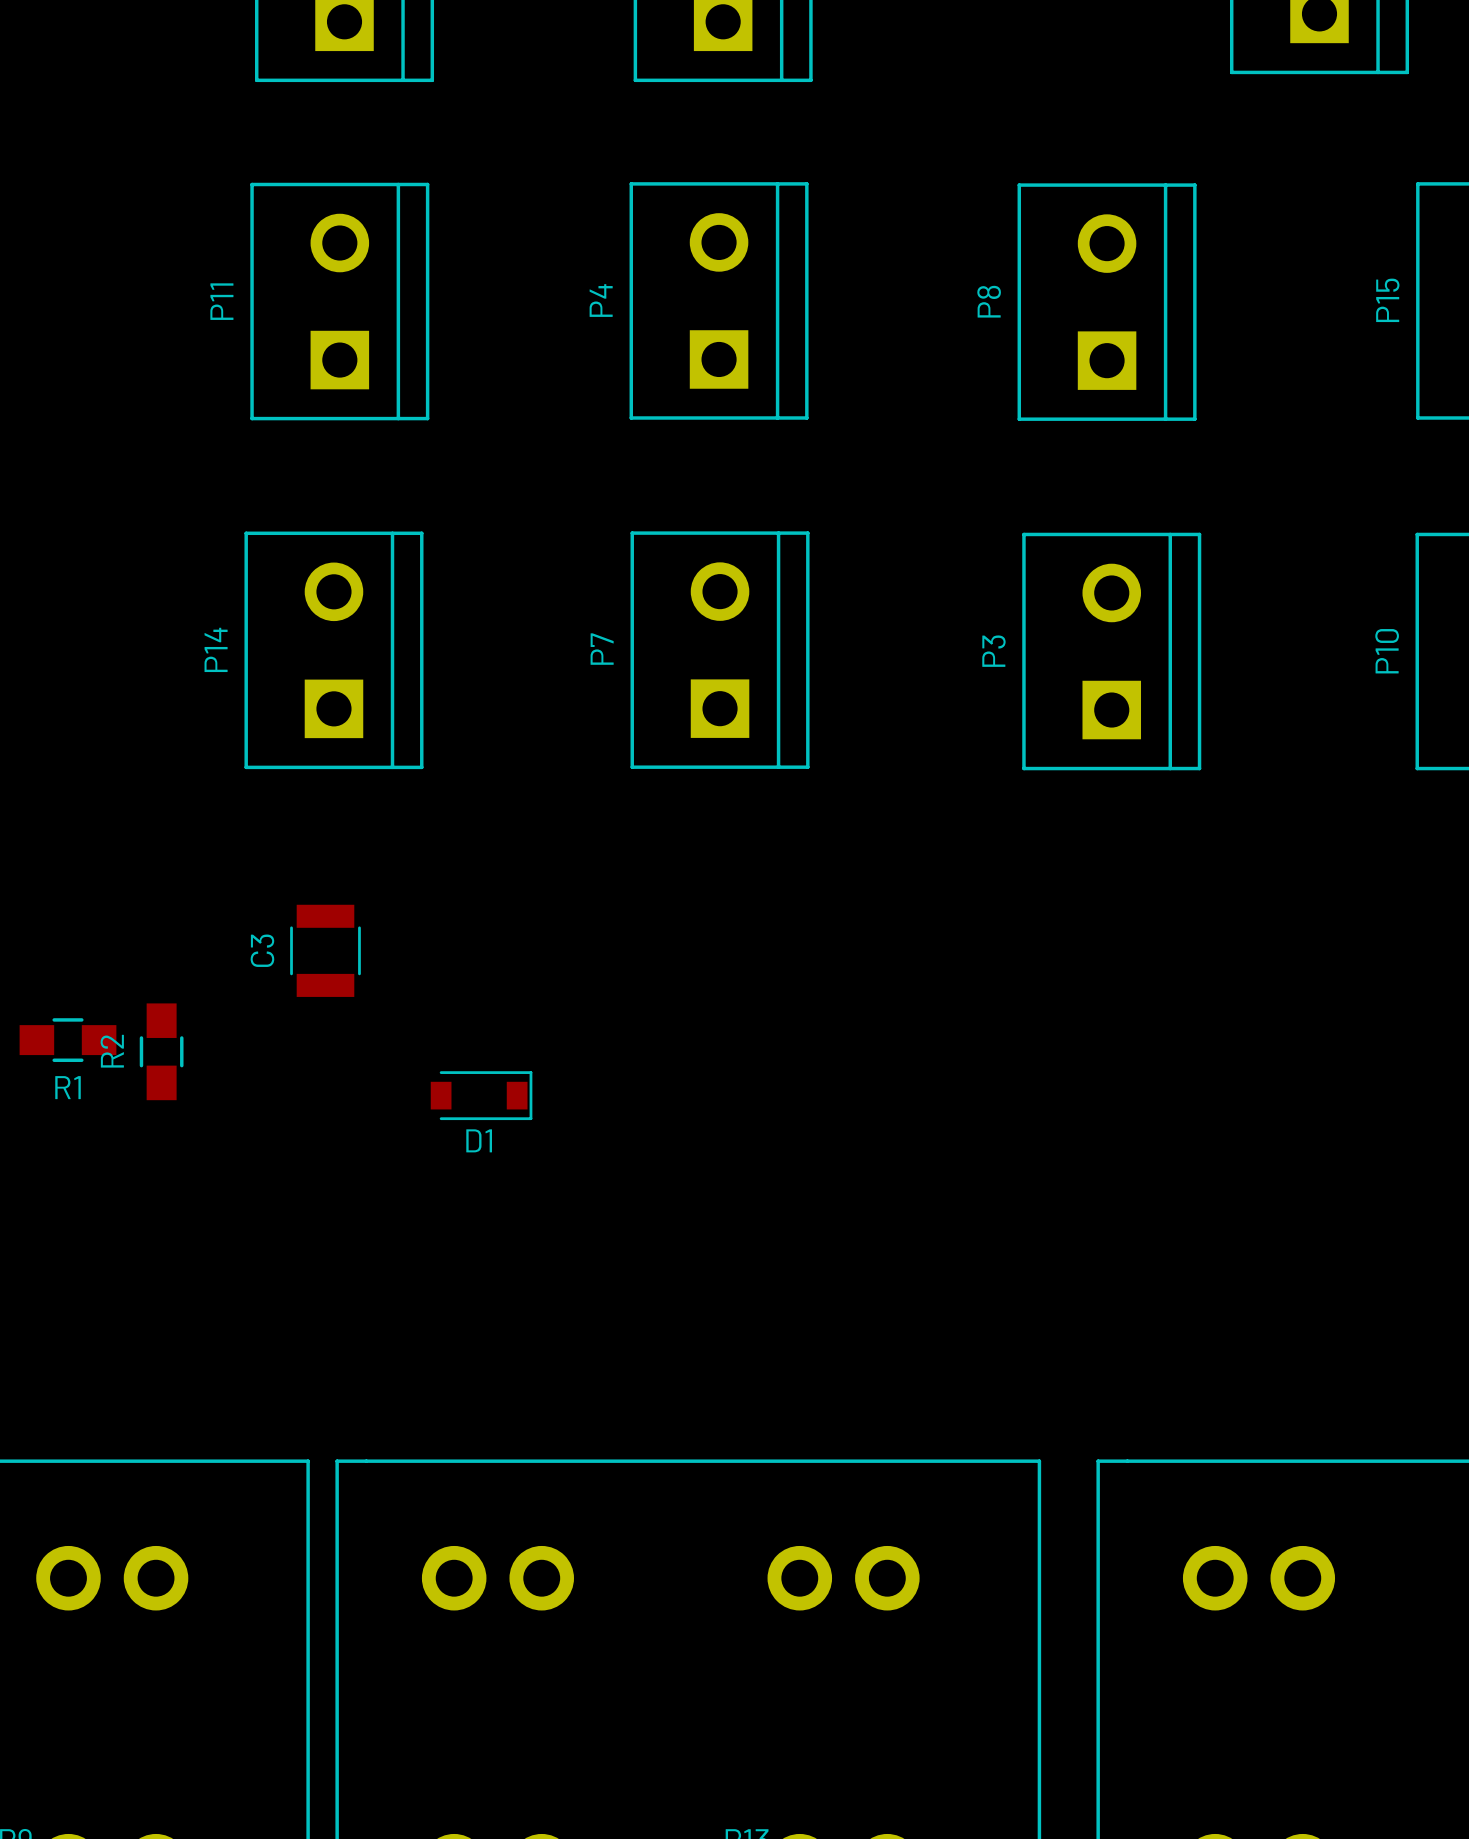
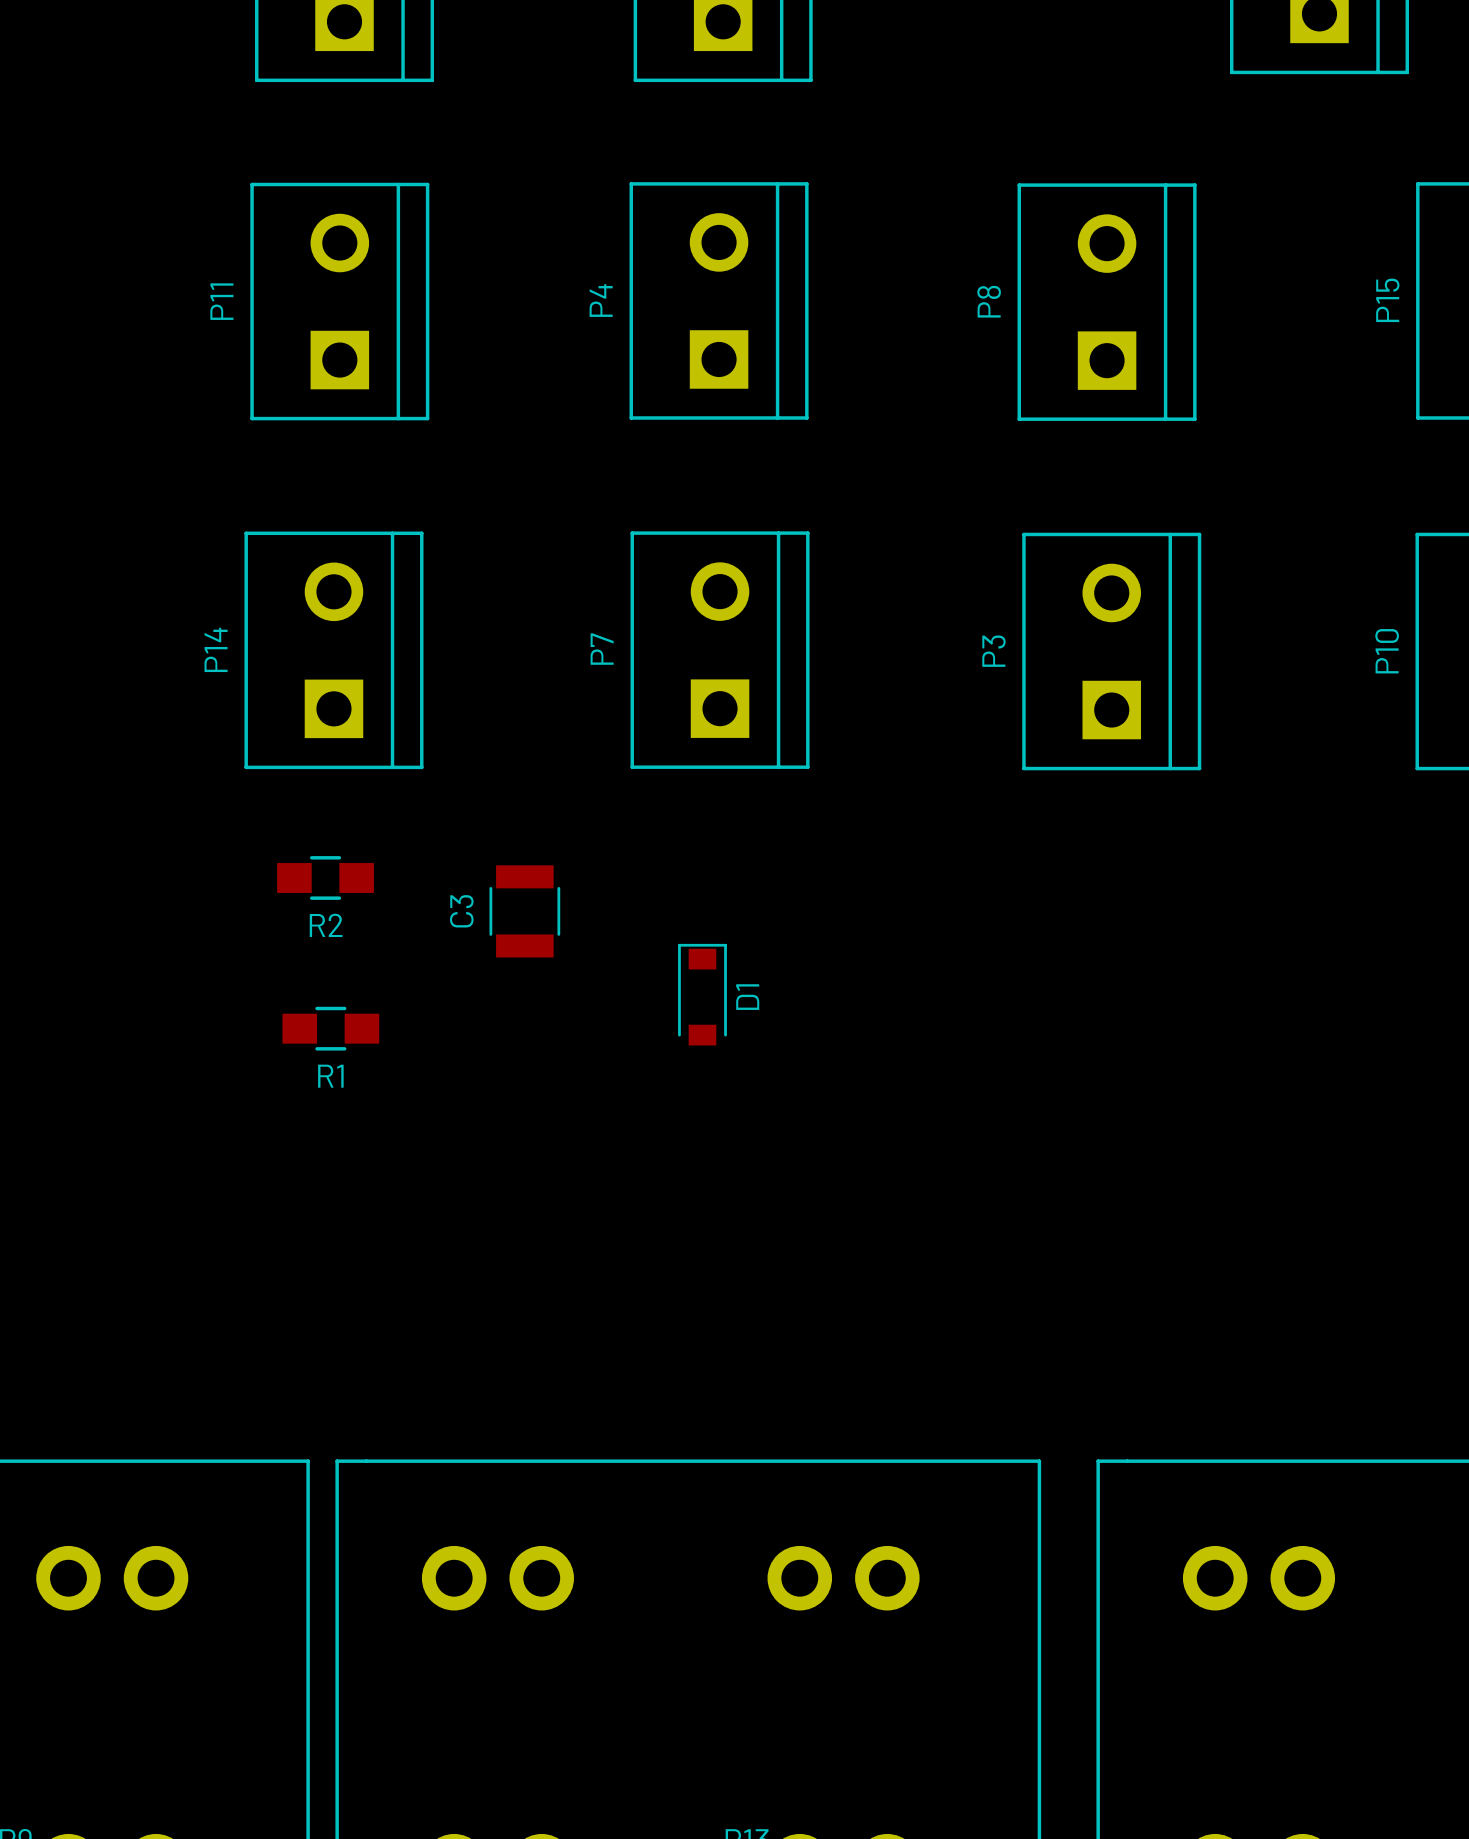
C3 position: (325, 950) -> (524, 911)
R1 position: (67, 1040) -> (330, 1028)
R2 name position: R2 (112, 1051) -> R2 (326, 925)
R2 rotation: 0° (161, 1051) -> 90° clockwise (325, 877)
R2 position: (161, 1051) -> (325, 877)
D1 rotation: 0° (481, 1095) -> 90° counterclockwise (702, 994)
D1 position: (481, 1095) -> (702, 994)

